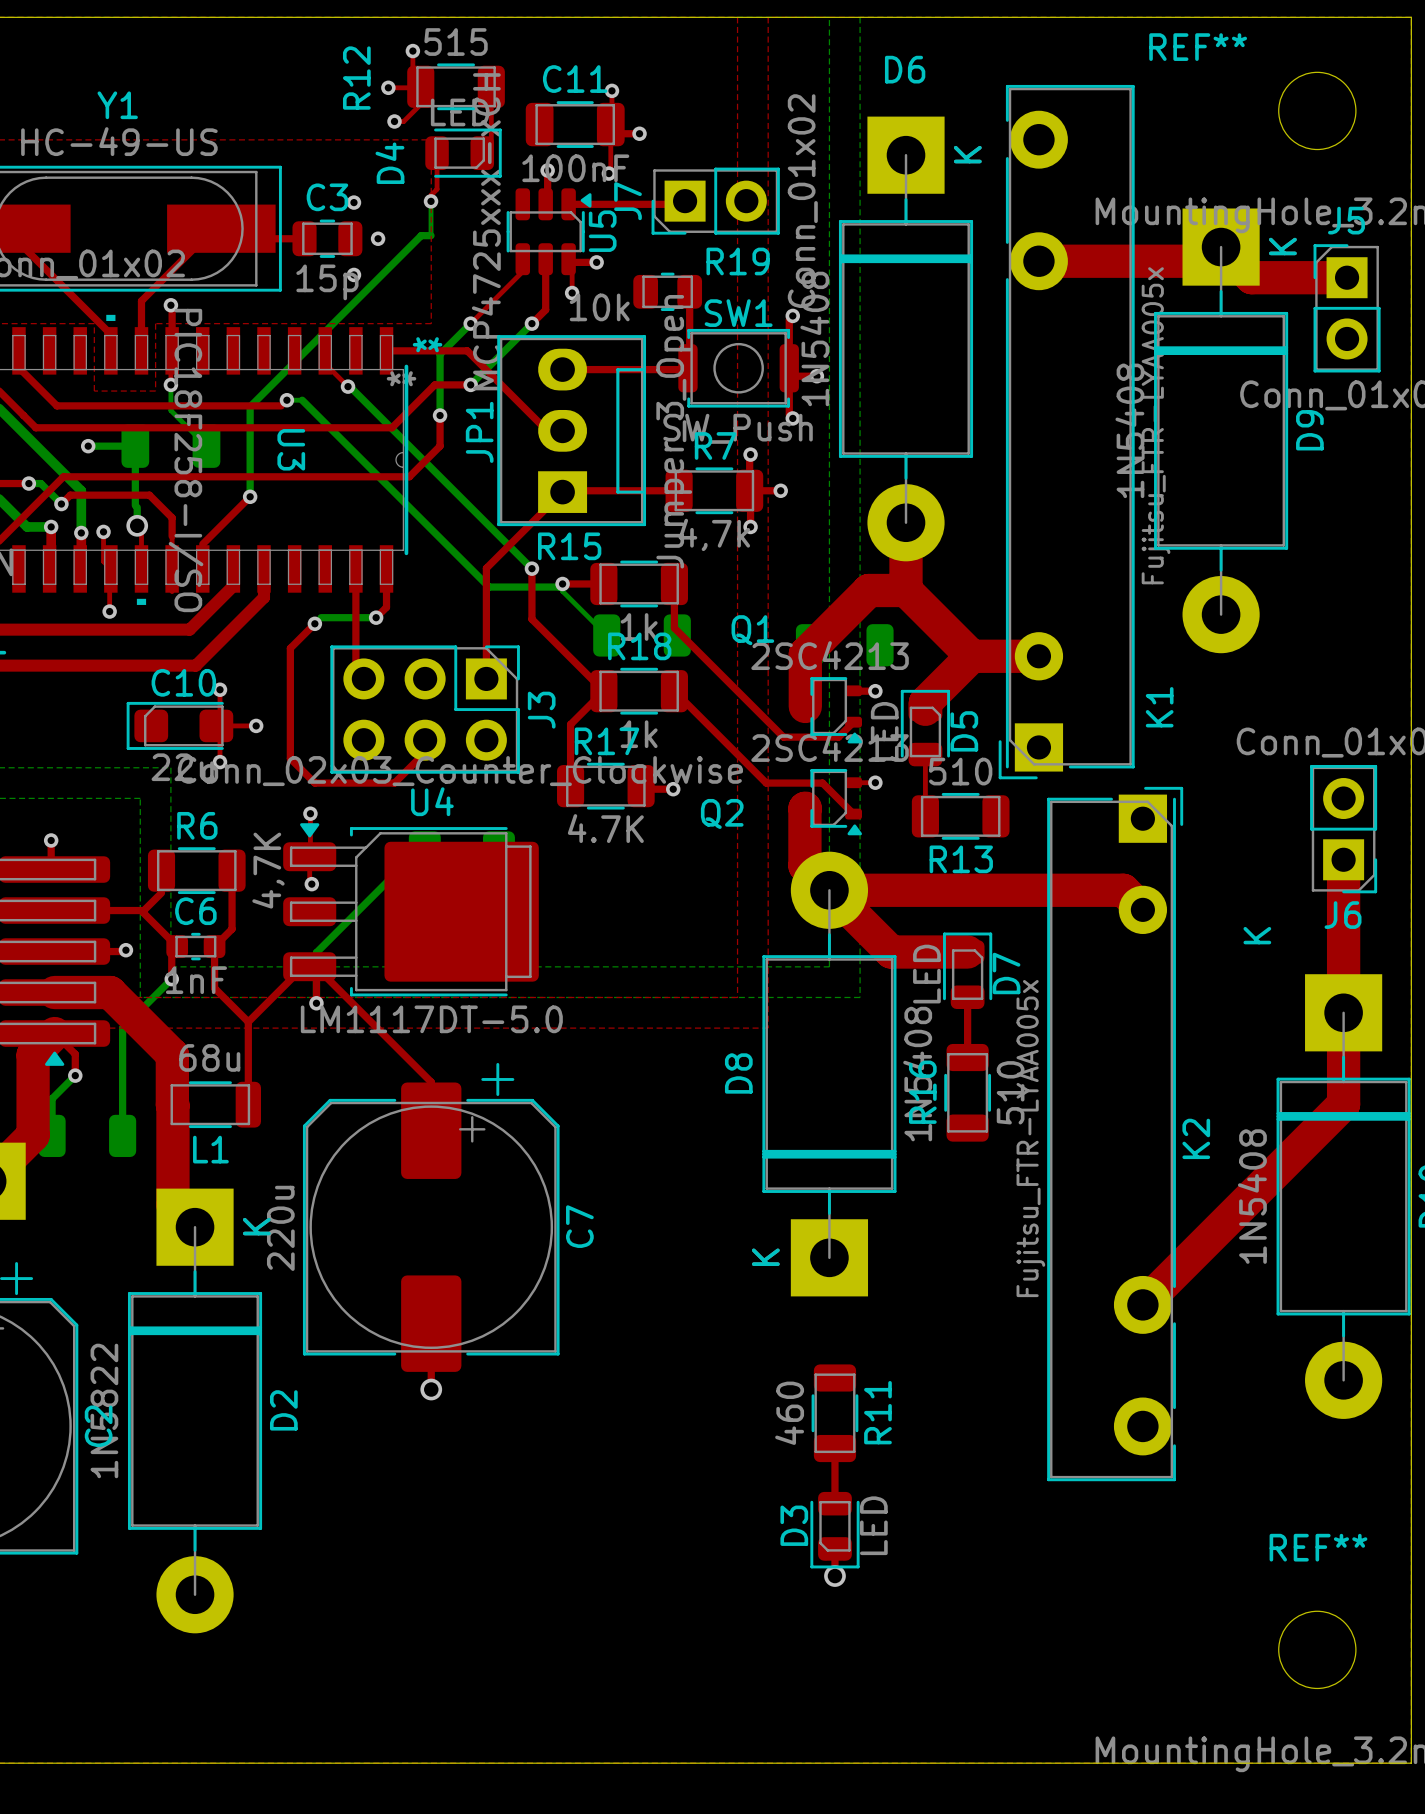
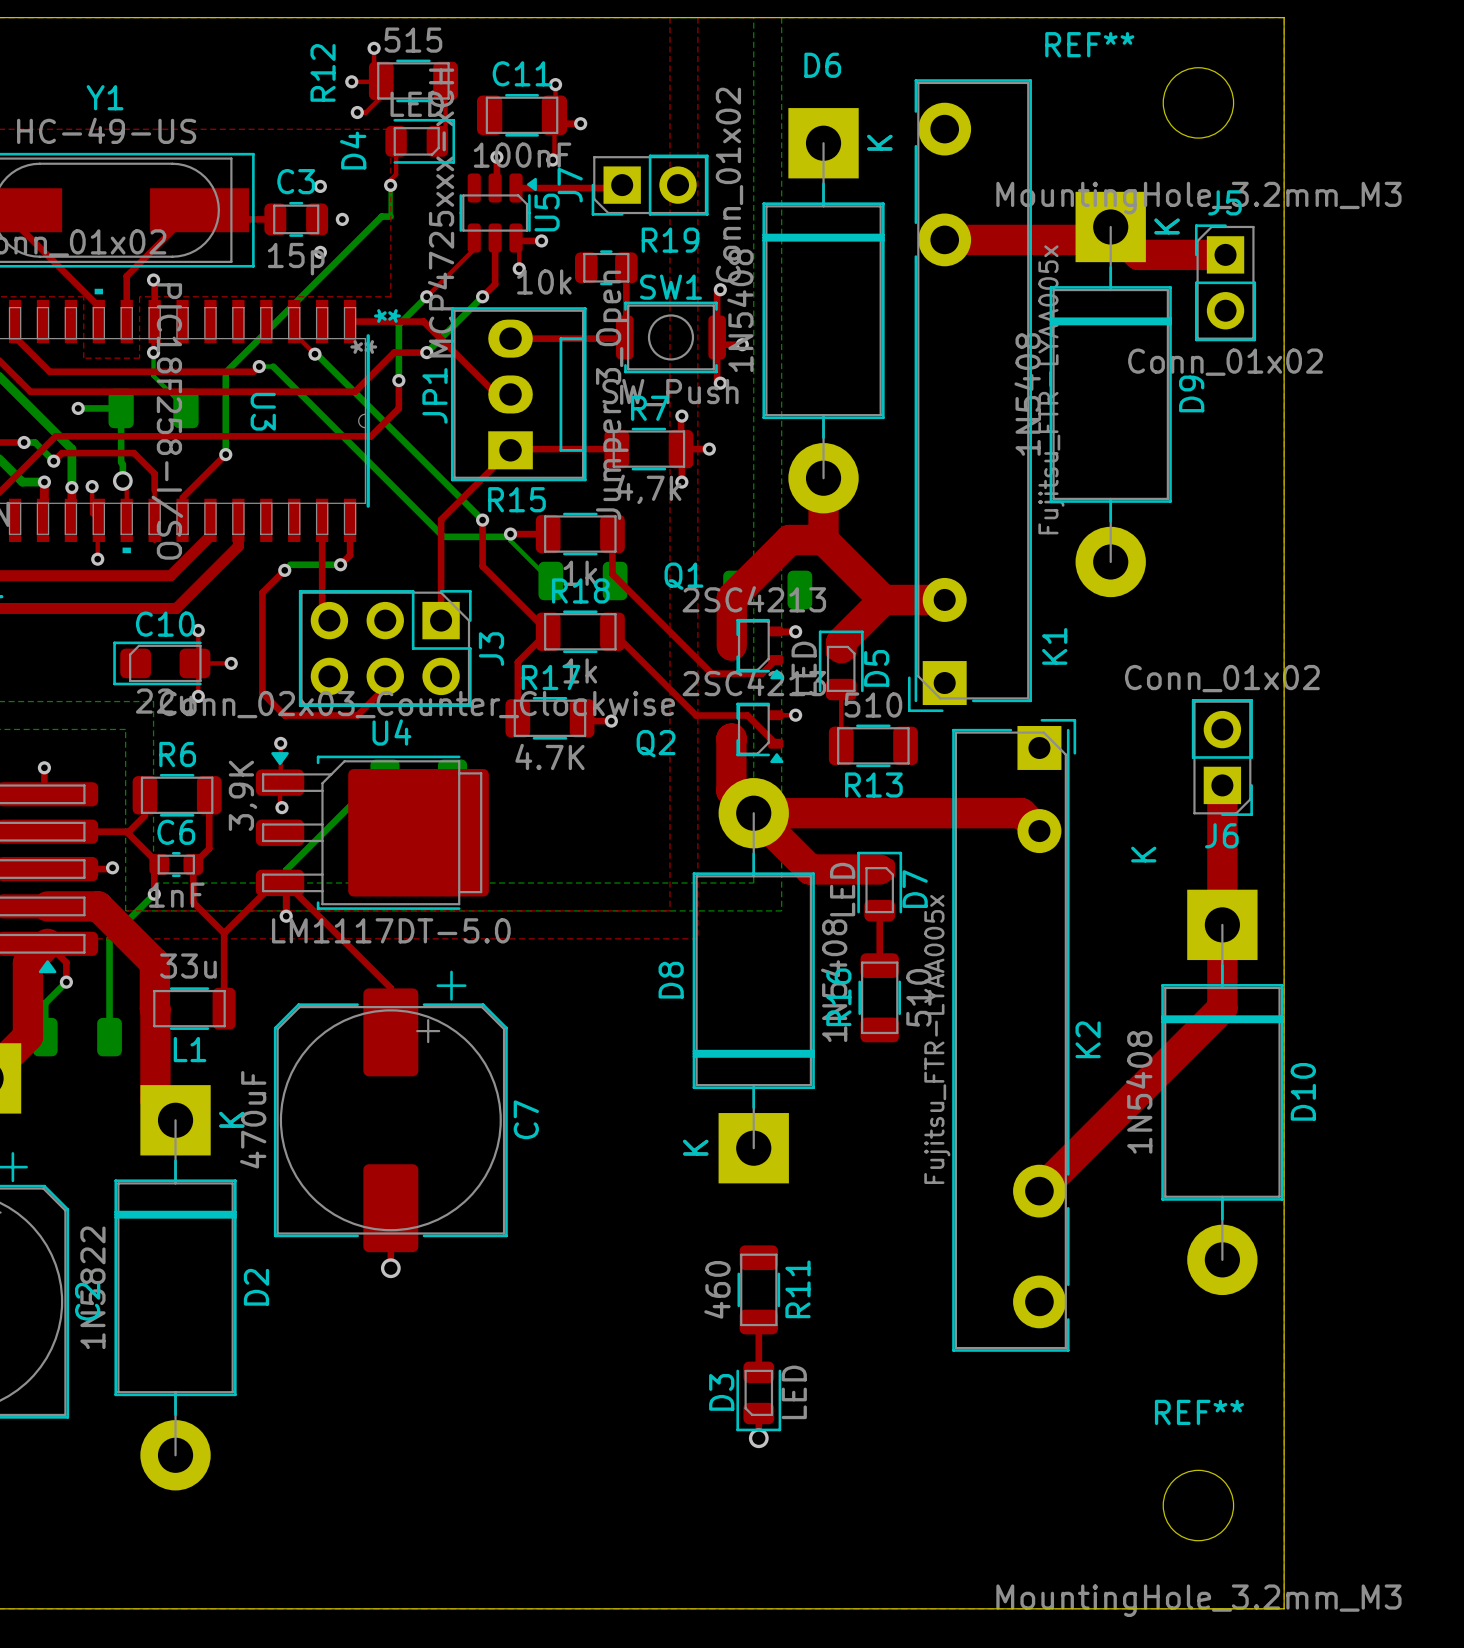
R6 value: 4,7K (268, 870) -> 3,9K (242, 795)
L1 value: 68u (209, 1057) -> 33u (188, 966)
C7 value: 220u (280, 1228) -> 470uF (253, 1119)

